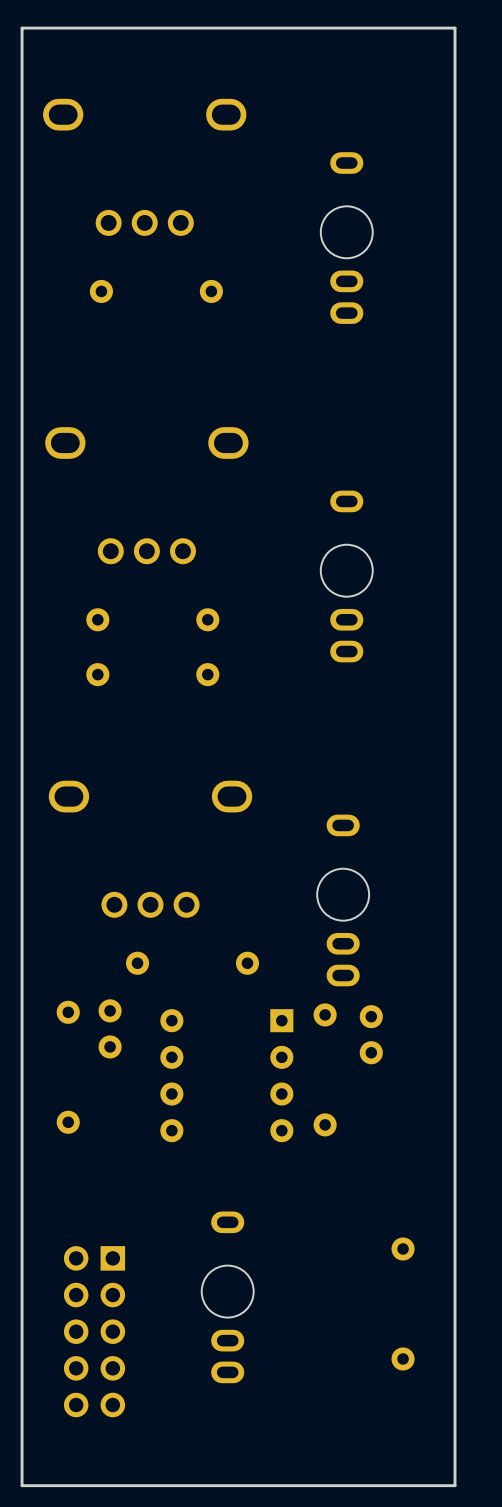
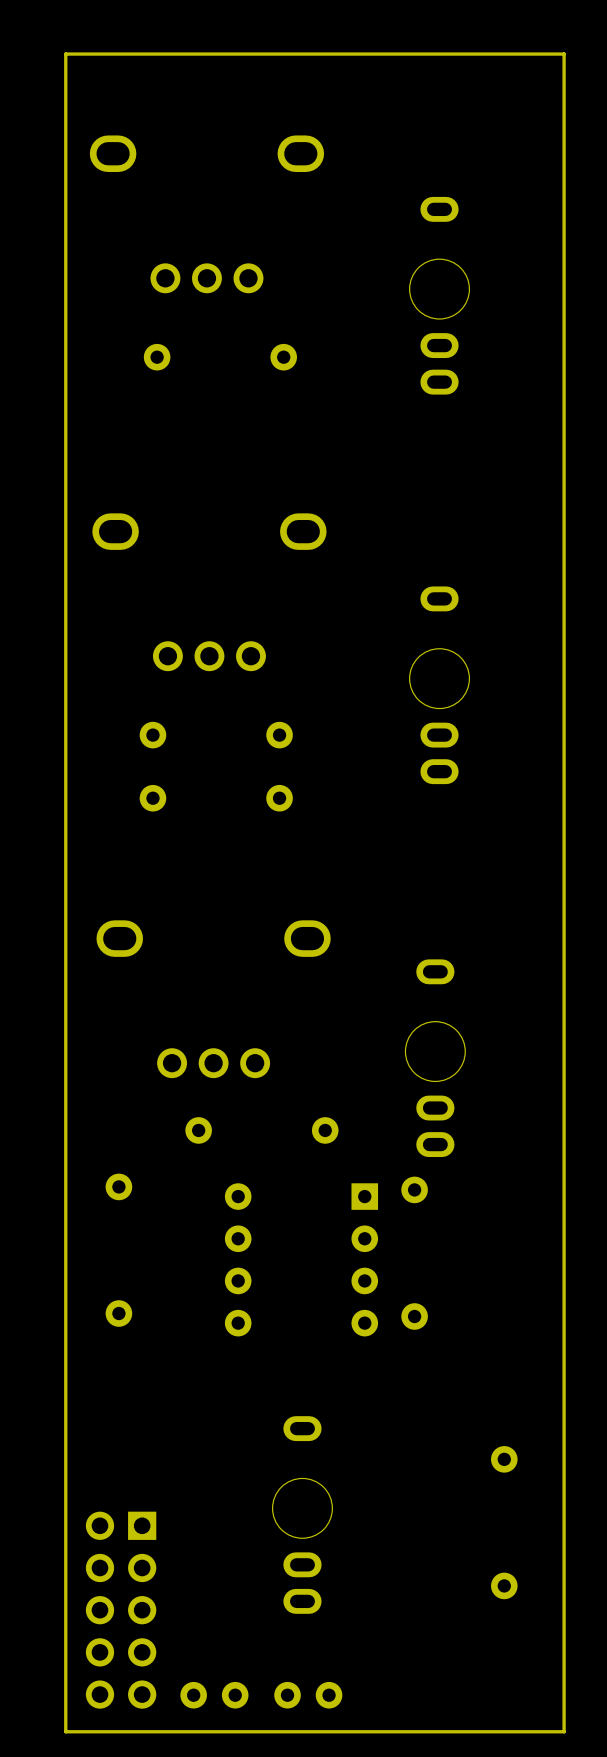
part: (110, 1028) -> none
part: (371, 1034) -> none
part position: (94, 1331) -> (121, 1610)
part: none -> (214, 1695)
part: none -> (308, 1695)

